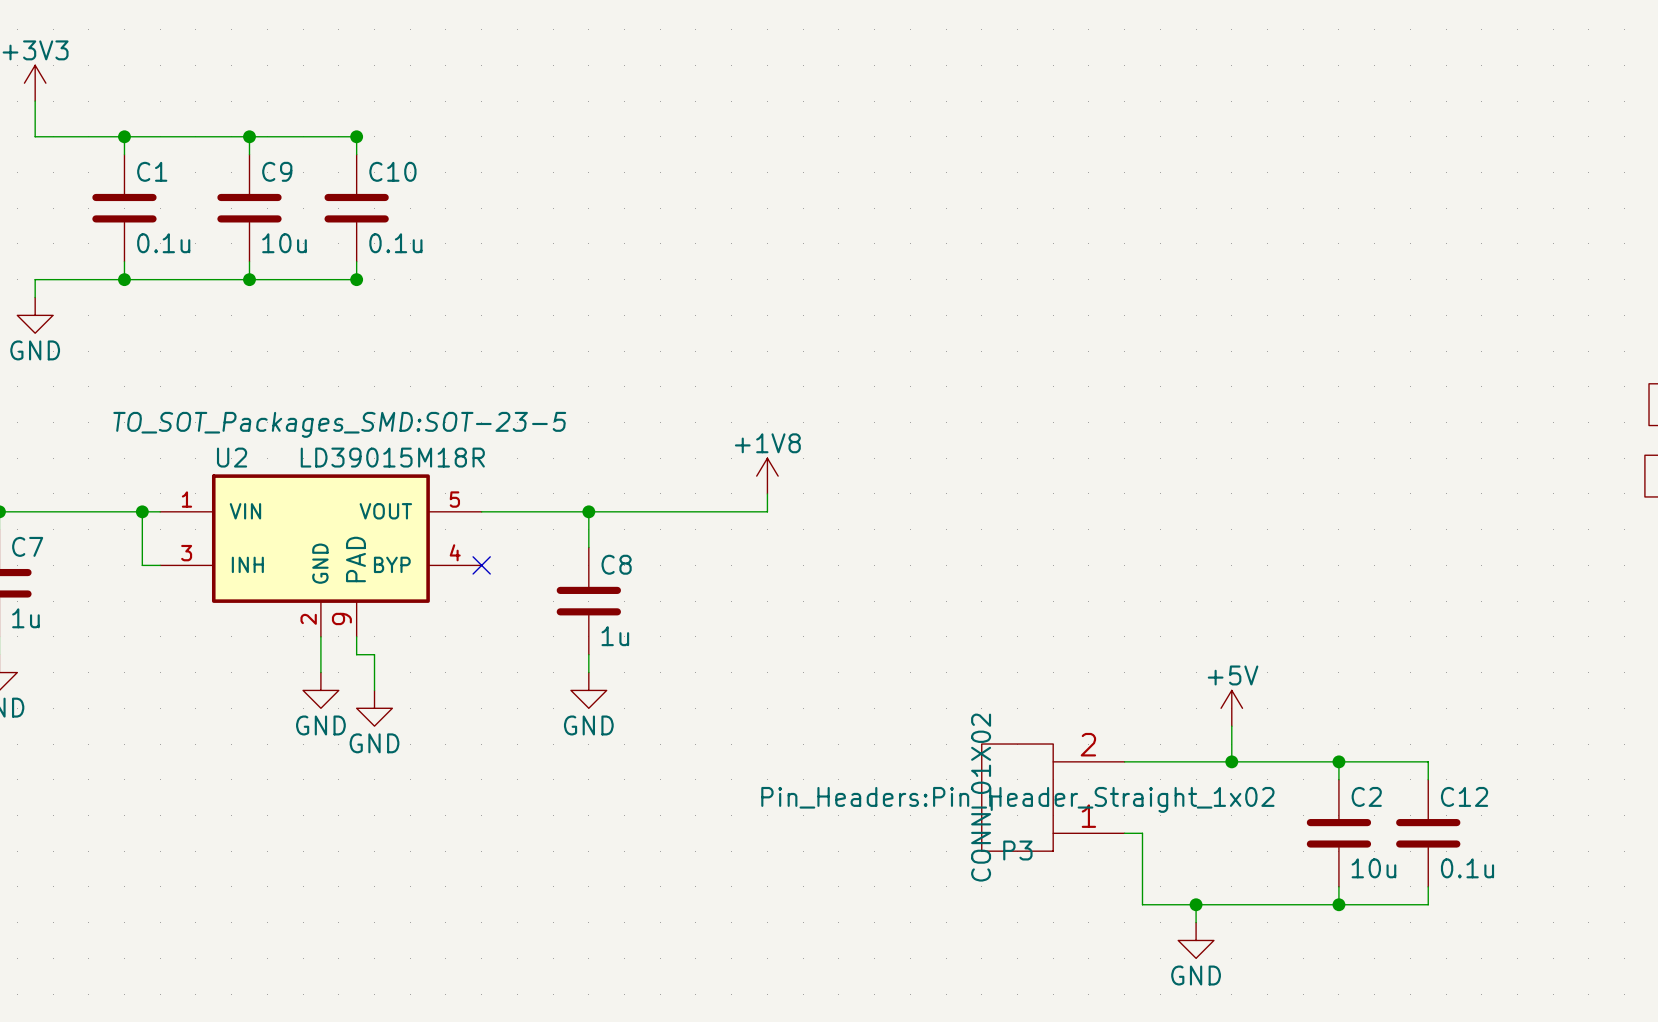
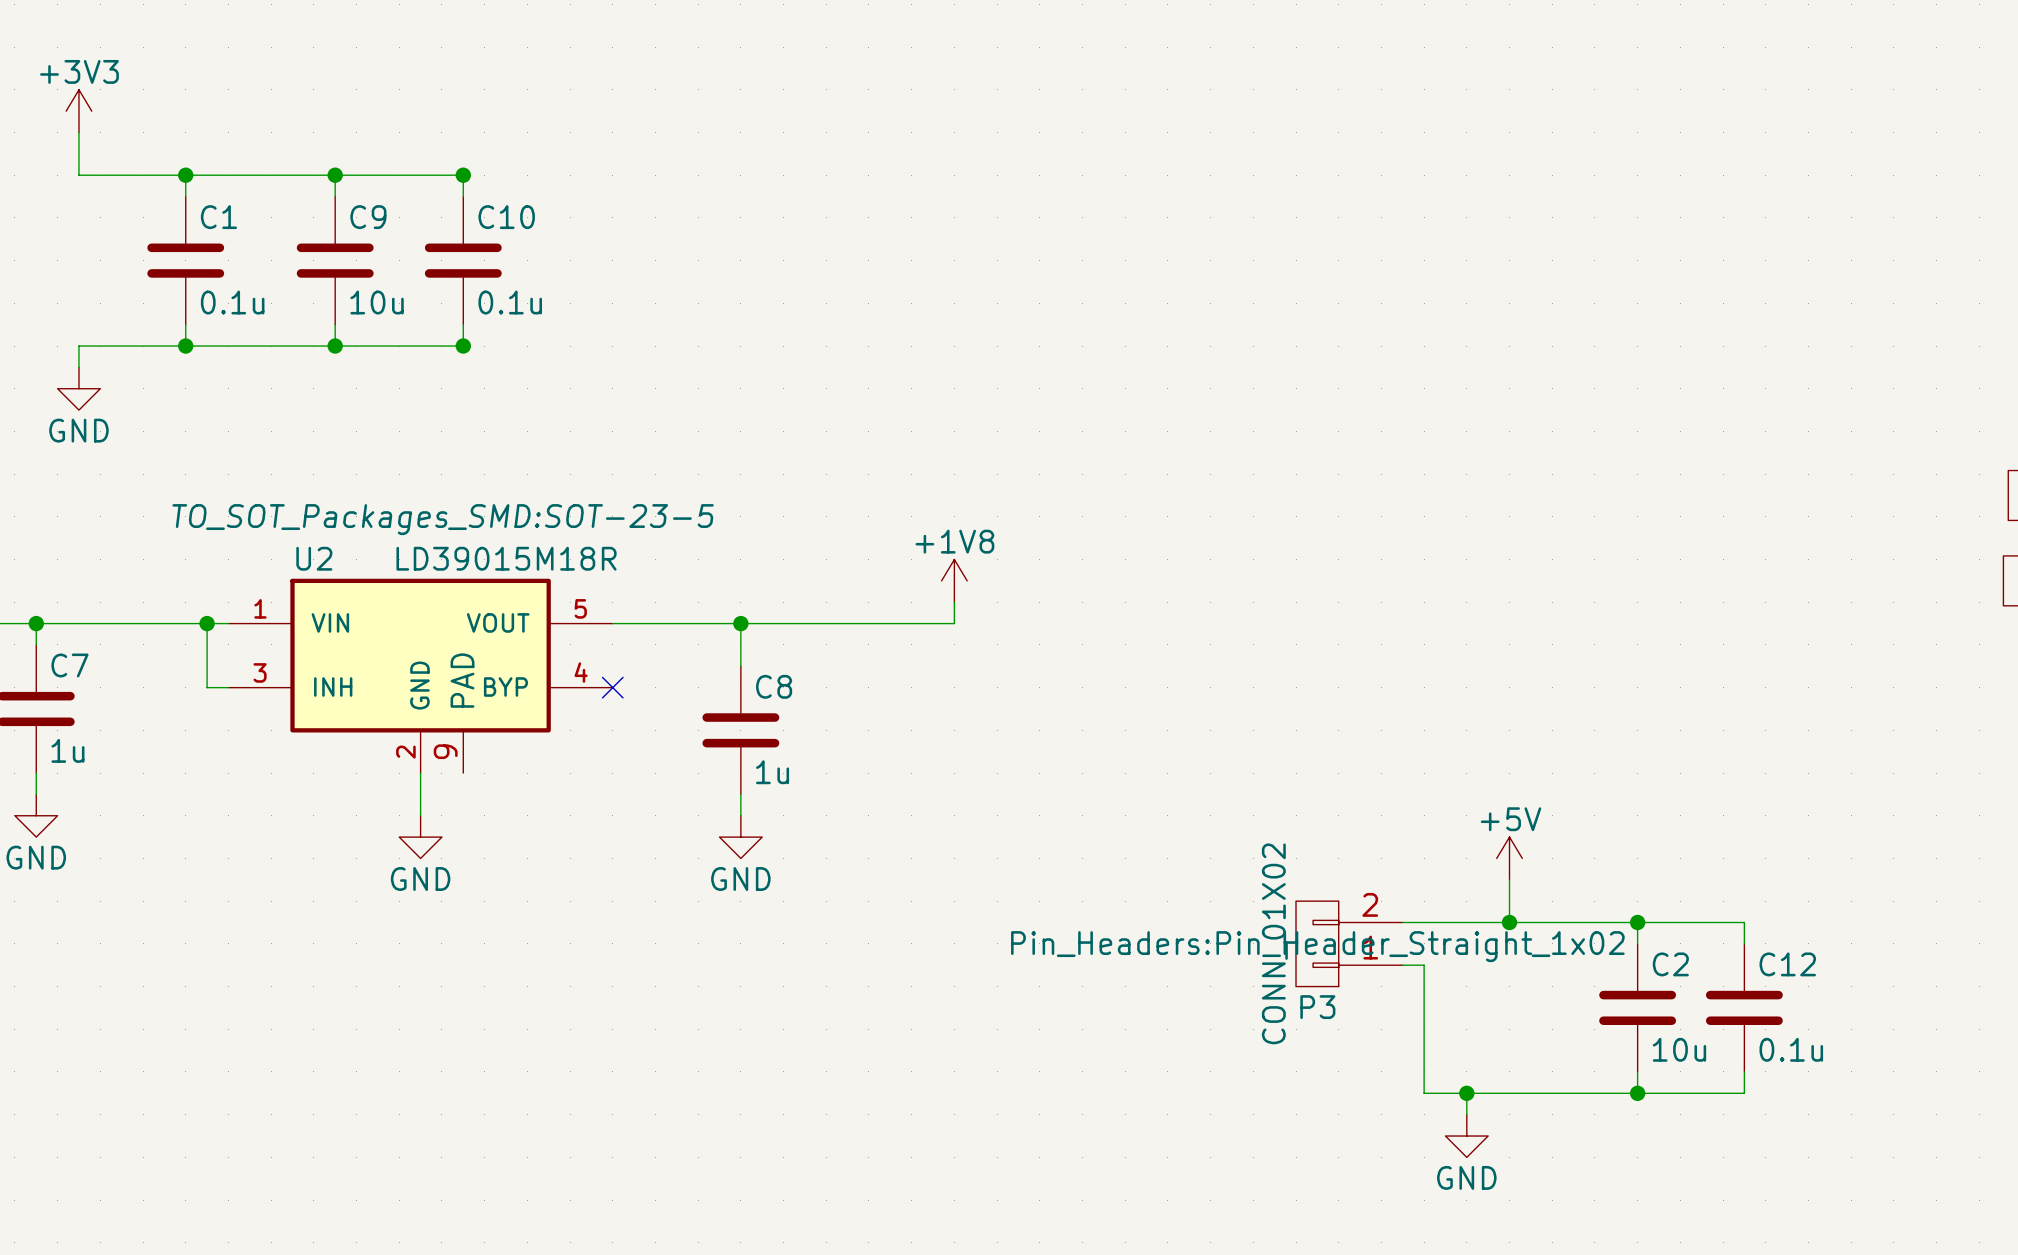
wire: (356, 636) (356, 654) (374, 654) (374, 690) -> none
power symbol: GND (374, 708) -> none
P3 symbol: [981, 744, 1125, 852] -> [1296, 901, 1403, 987]
wire: (1124, 833) (1142, 833) (1142, 904) (1160, 904) -> (1402, 965) (1424, 965) (1424, 1093)

